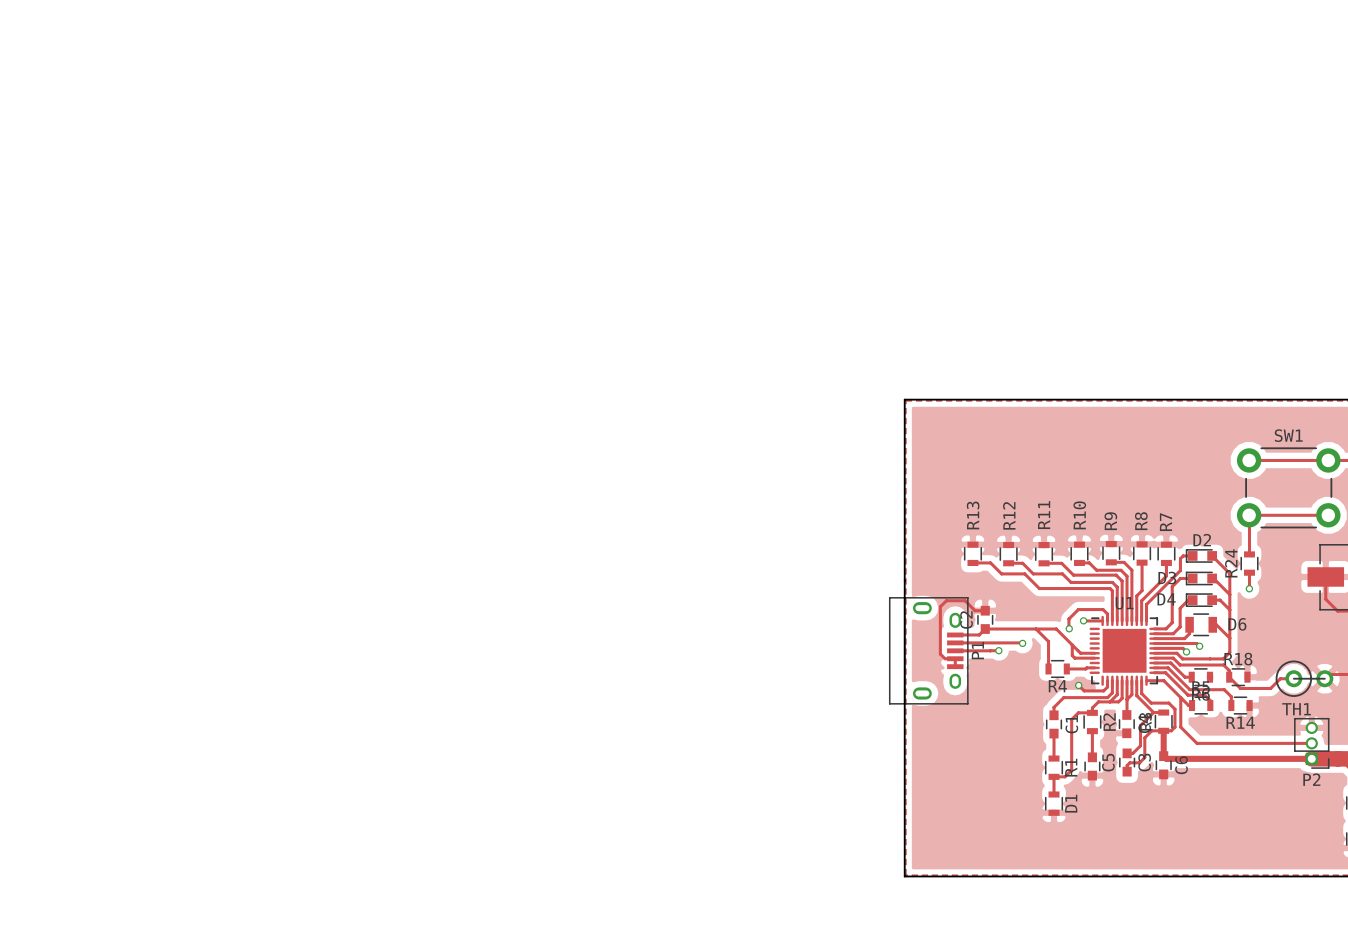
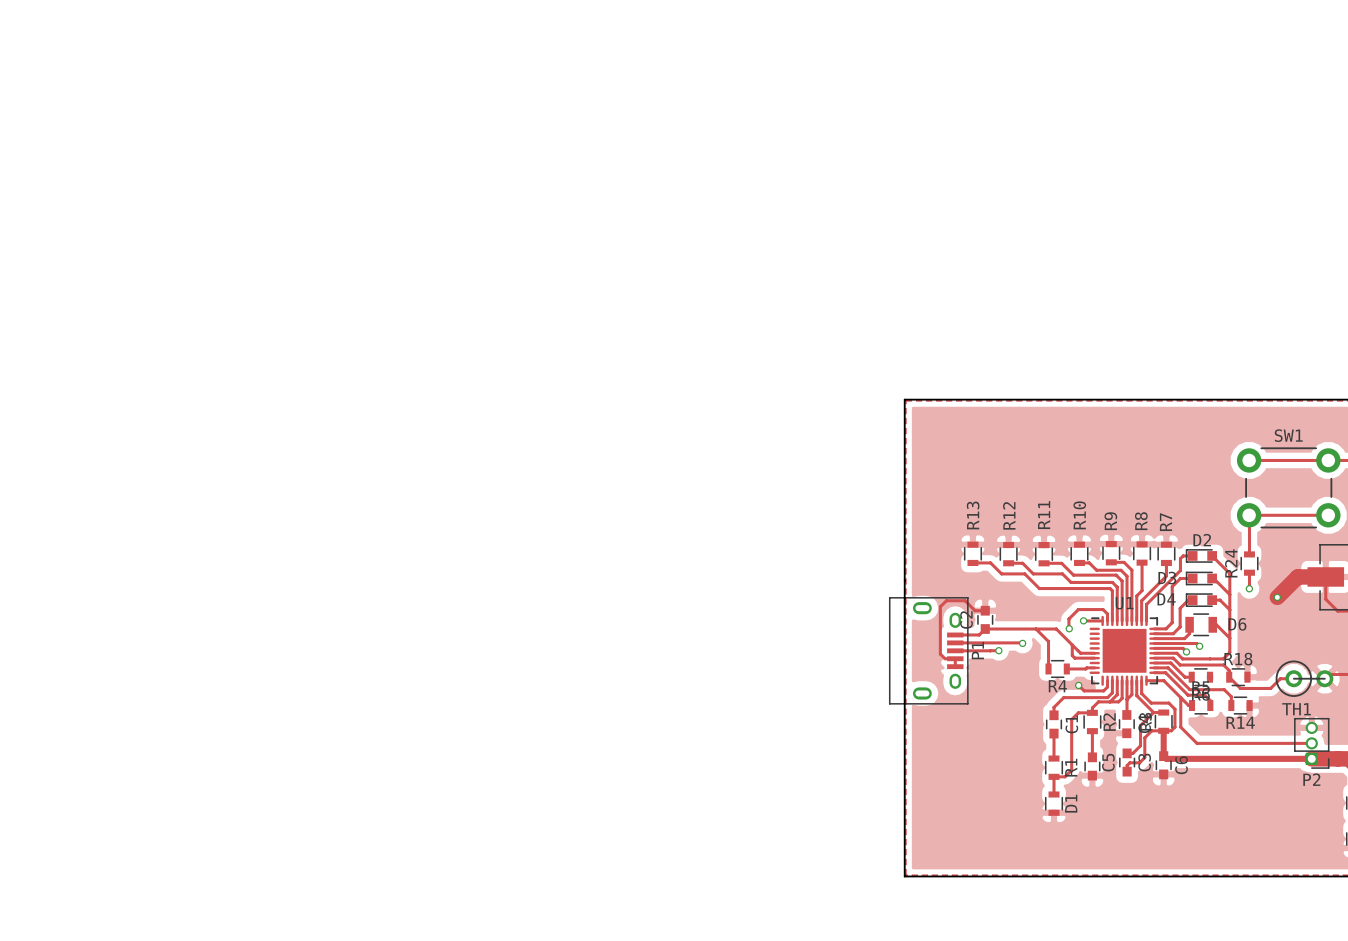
track: none -> (1325, 576) (1297, 576) (1277, 597)
via: none -> (1277, 597)

